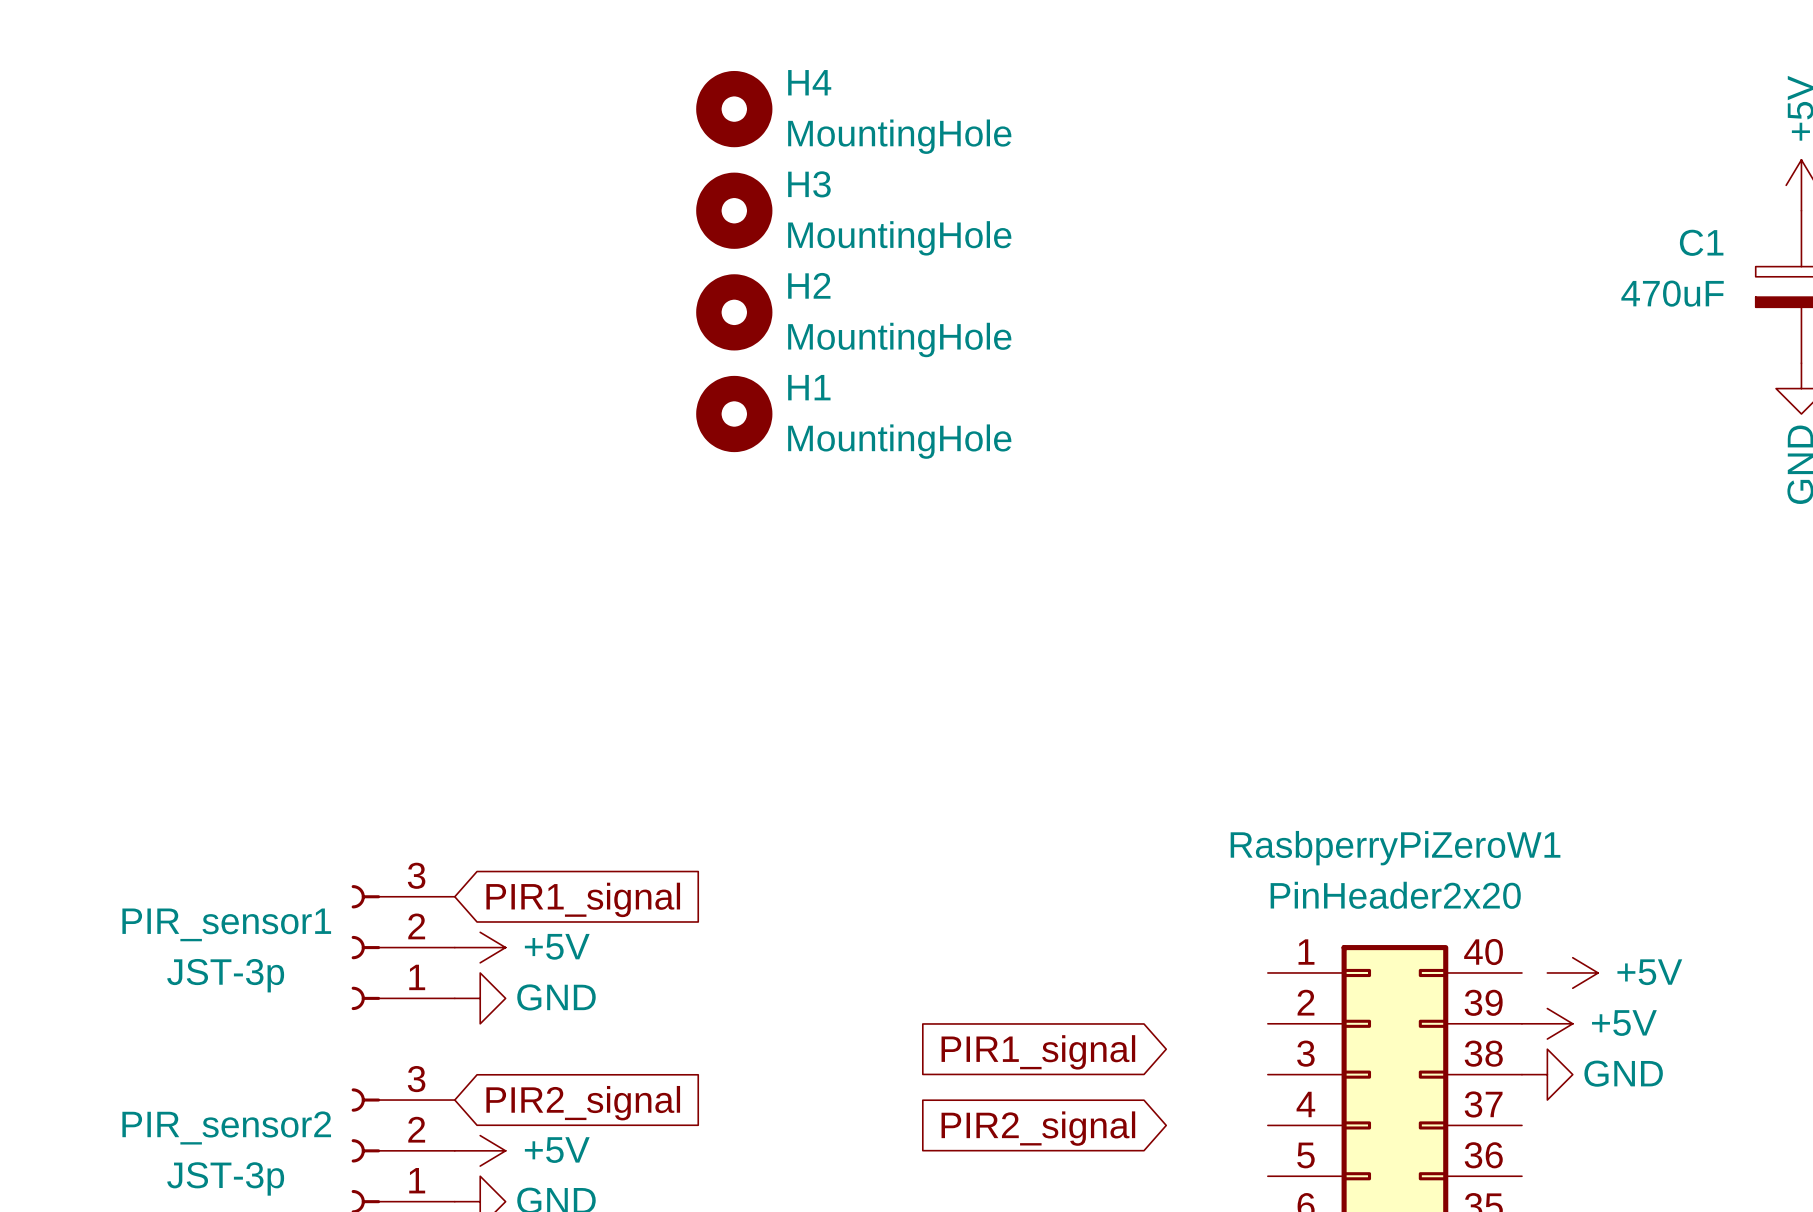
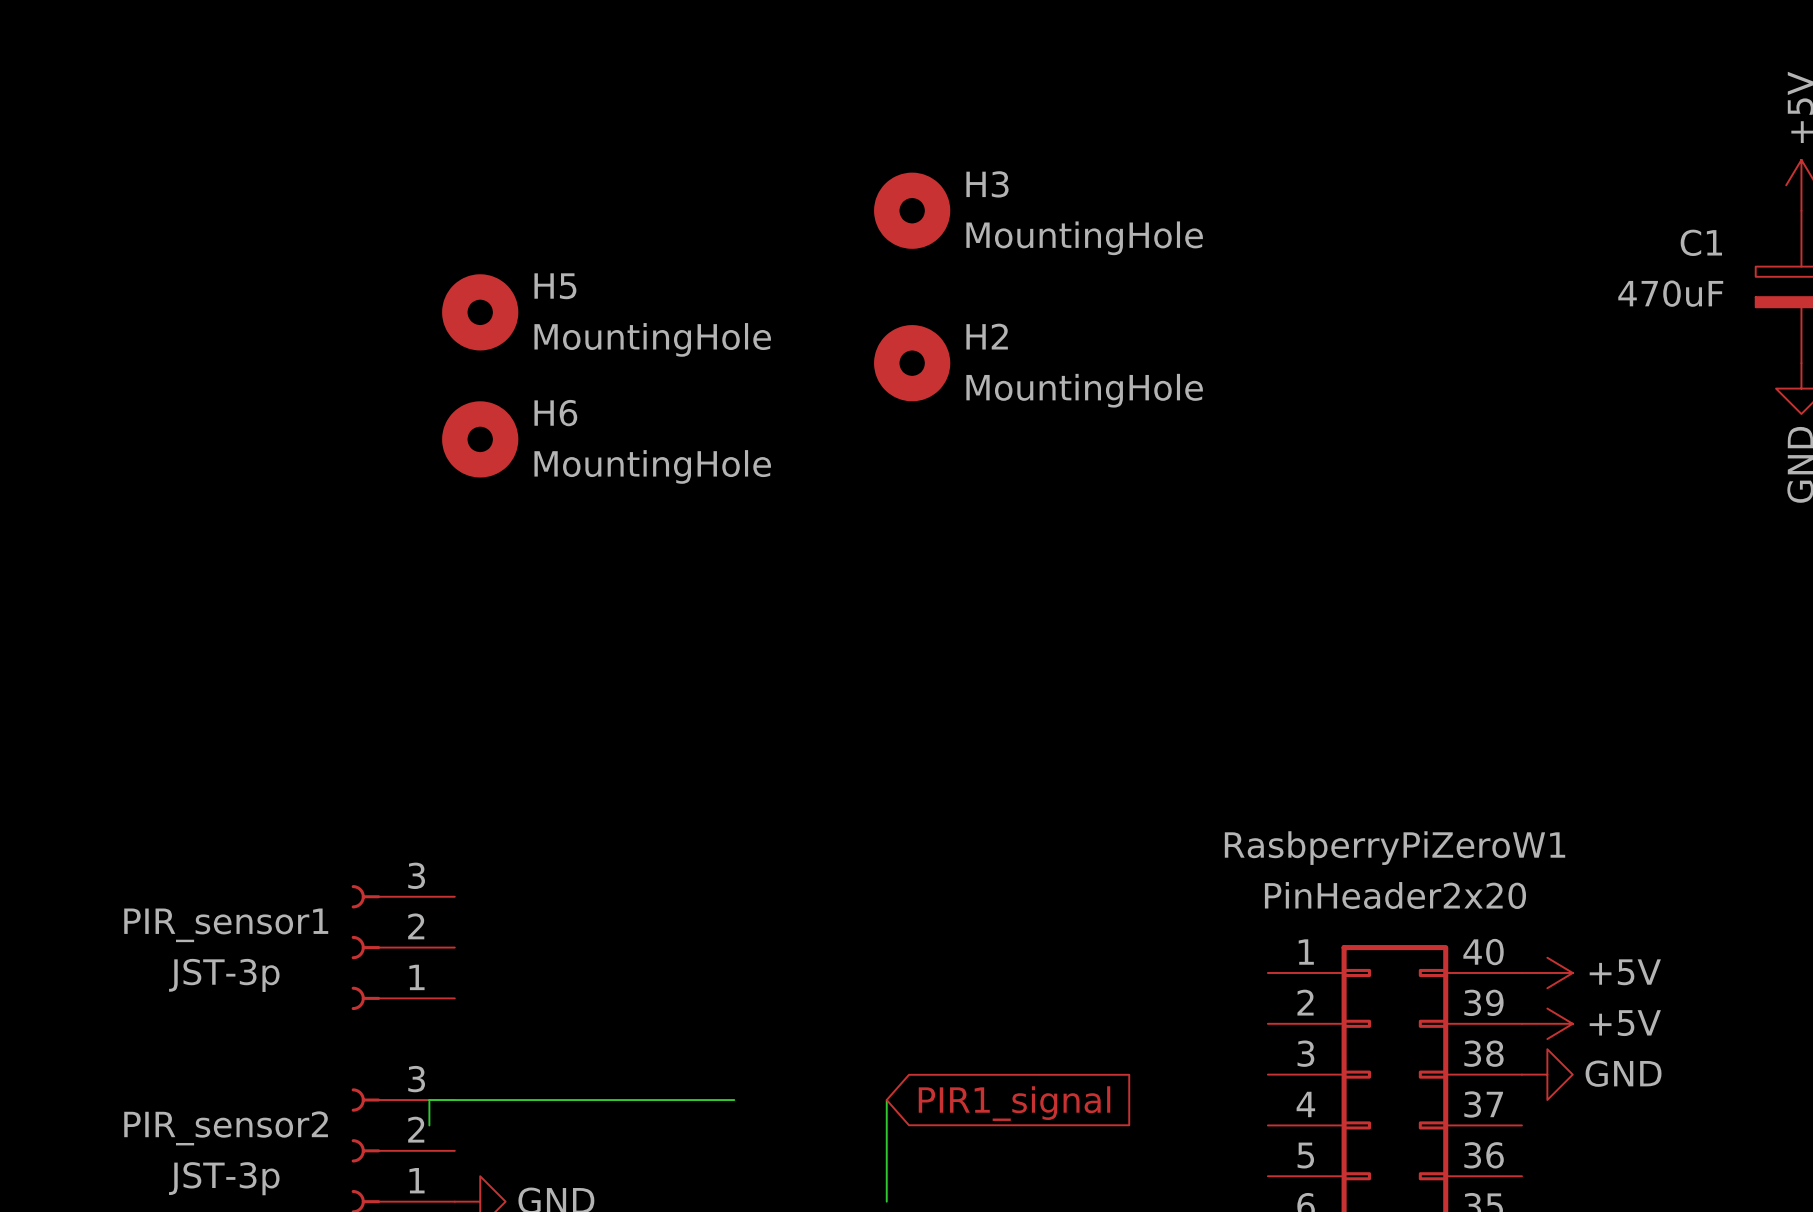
H4: MountingHole (734, 109) -> none
H3 position: (734, 210) -> (912, 210)
H5: none -> MountingHole (480, 312)
H2 position: (734, 312) -> (912, 363)
H1: MountingHole (734, 414) -> none
H6: none -> MountingHole (480, 439)
global label: PIR1_signal (583, 899) -> none
power symbol: +5V (480, 947) -> none
power symbol position: +5V (1572, 972) -> +5V (1547, 972)
power symbol: GND (480, 998) -> none
global label: PIR1_signal (1038, 1052) -> none
wire: none -> (734, 1100) (429, 1100) (429, 1125)
wire: none -> (886, 1100) (886, 1201)
global label: PIR2_signal (583, 1103) -> none
global label: none -> PIR1_signal (1014, 1103)
global label: PIR2_signal (1038, 1128) -> none
power symbol: +5V (480, 1150) -> none

